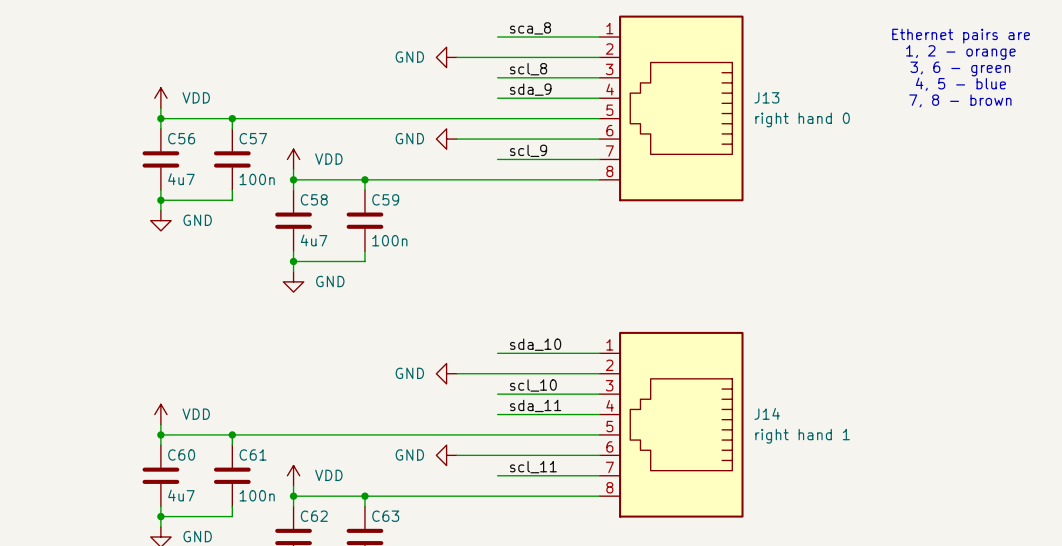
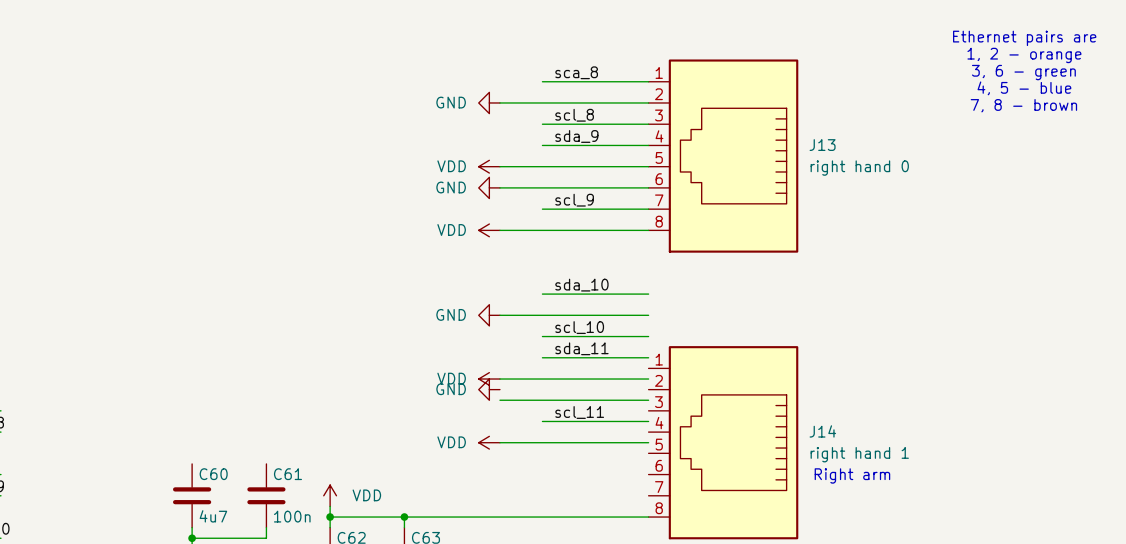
label: sca_8 (530, 28) -> none
wire: (497, 37) (599, 37) -> (542, 209) (648, 209)
power symbol: GND (446, 57) -> none
wire: (456, 57) (599, 57) -> (499, 230) (648, 230)
label: scl_8 (528, 69) -> sca_8 (576, 72)
label position: sda_9 (530, 89) -> sda_9 (576, 136)
power symbol: VDD (160, 98) -> none
power symbol: none -> GND (489, 102)
wire: none -> (499, 102) (542, 102)
wire: (160, 108) (160, 128) -> none
J13 position: (671, 108) -> (723, 156)
label: none -> scl_8 (574, 115)
wire: (160, 118) (497, 118) -> none
junction: (160, 118) -> none
wire: (232, 118) (232, 128) -> none
junction: (232, 118) -> none
power symbol: GND (446, 139) -> none
wire: (456, 139) (497, 139) -> (499, 166) (542, 166)
label position: scl_9 (528, 150) -> scl_9 (574, 200)
C56: 4u7 (160, 159) -> none
C57: 100n (232, 159) -> none
power symbol: VDD (293, 159) -> none
power symbol: none -> VDD (489, 166)
wire: (293, 169) (293, 190) -> none
wire: (293, 179) (456, 179) -> none
junction: (293, 179) -> none
wire: (364, 179) (364, 190) -> none
junction: (364, 179) -> none
power symbol: none -> GND (489, 187)
wire: (160, 190) (160, 210) -> none
wire: (232, 190) (232, 200) (160, 200) -> none
junction: (160, 200) -> none
power symbol: GND (160, 220) -> none
C58: 4u7 (293, 220) -> none
C59: 100n (364, 220) -> none
power symbol: none -> VDD (489, 230)
wire: (293, 251) (293, 271) -> none
wire: (364, 251) (364, 261) (293, 261) -> none
junction: (293, 261) -> none
power symbol: GND (293, 281) -> none
power symbol: none -> GND (489, 315)
label position: sda_10 (535, 344) -> sda_10 (581, 285)
wire: (497, 353) (599, 353) -> (542, 294) (648, 294)
power symbol: none -> VDD (489, 379)
wire: none -> (499, 379) (648, 379)
wire: (456, 373) (599, 373) -> (499, 315) (648, 315)
label position: scl_10 (533, 385) -> scl_10 (579, 327)
wire: (497, 394) (599, 394) -> (542, 336) (648, 336)
label position: sda_11 (535, 405) -> sda_11 (581, 348)
power symbol: VDD (160, 414) -> none
wire: (497, 414) (599, 414) -> (542, 357) (648, 357)
wire: (160, 424) (160, 445) -> none
power symbol: none -> VDD (489, 442)
wire: none -> (499, 442) (648, 442)
wire: (160, 434) (599, 434) -> none
junction: (160, 434) -> none
wire: (232, 434) (232, 445) -> none
junction: (232, 434) -> none
power symbol: GND (446, 455) -> none
wire: (456, 455) (599, 455) -> (499, 400) (648, 400)
text: none -> Right arm (852, 475)
label position: scl_11 (533, 467) -> scl_11 (579, 412)
wire: (497, 475) (599, 475) -> (542, 421) (648, 421)

